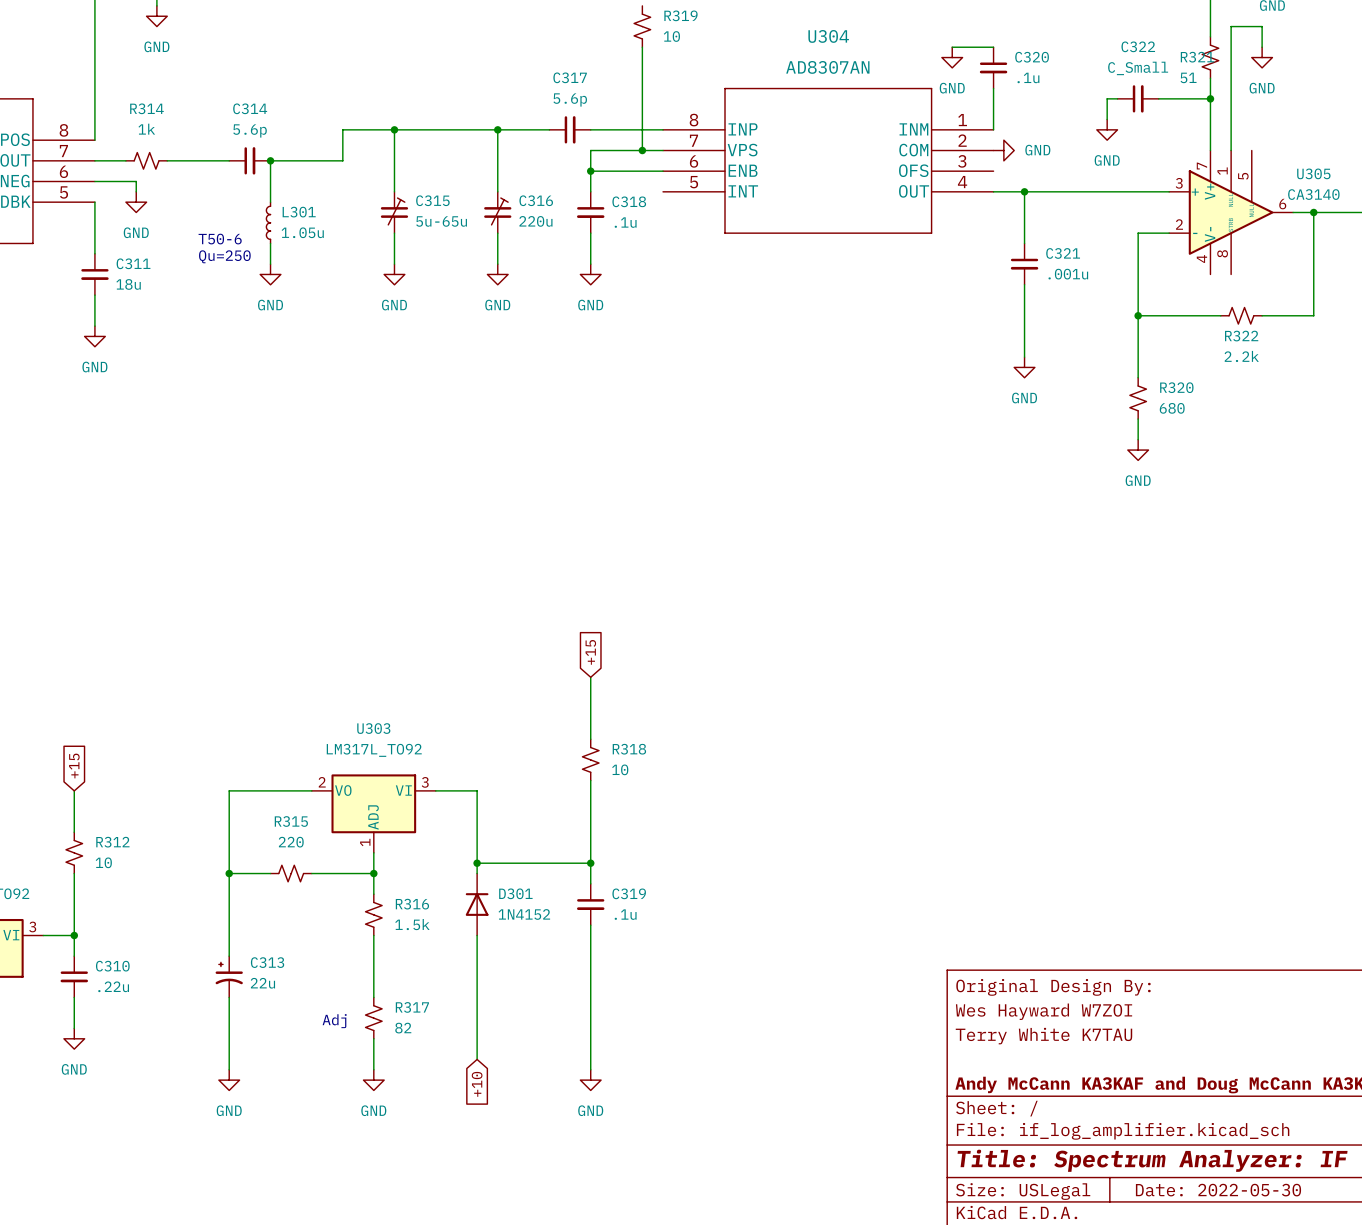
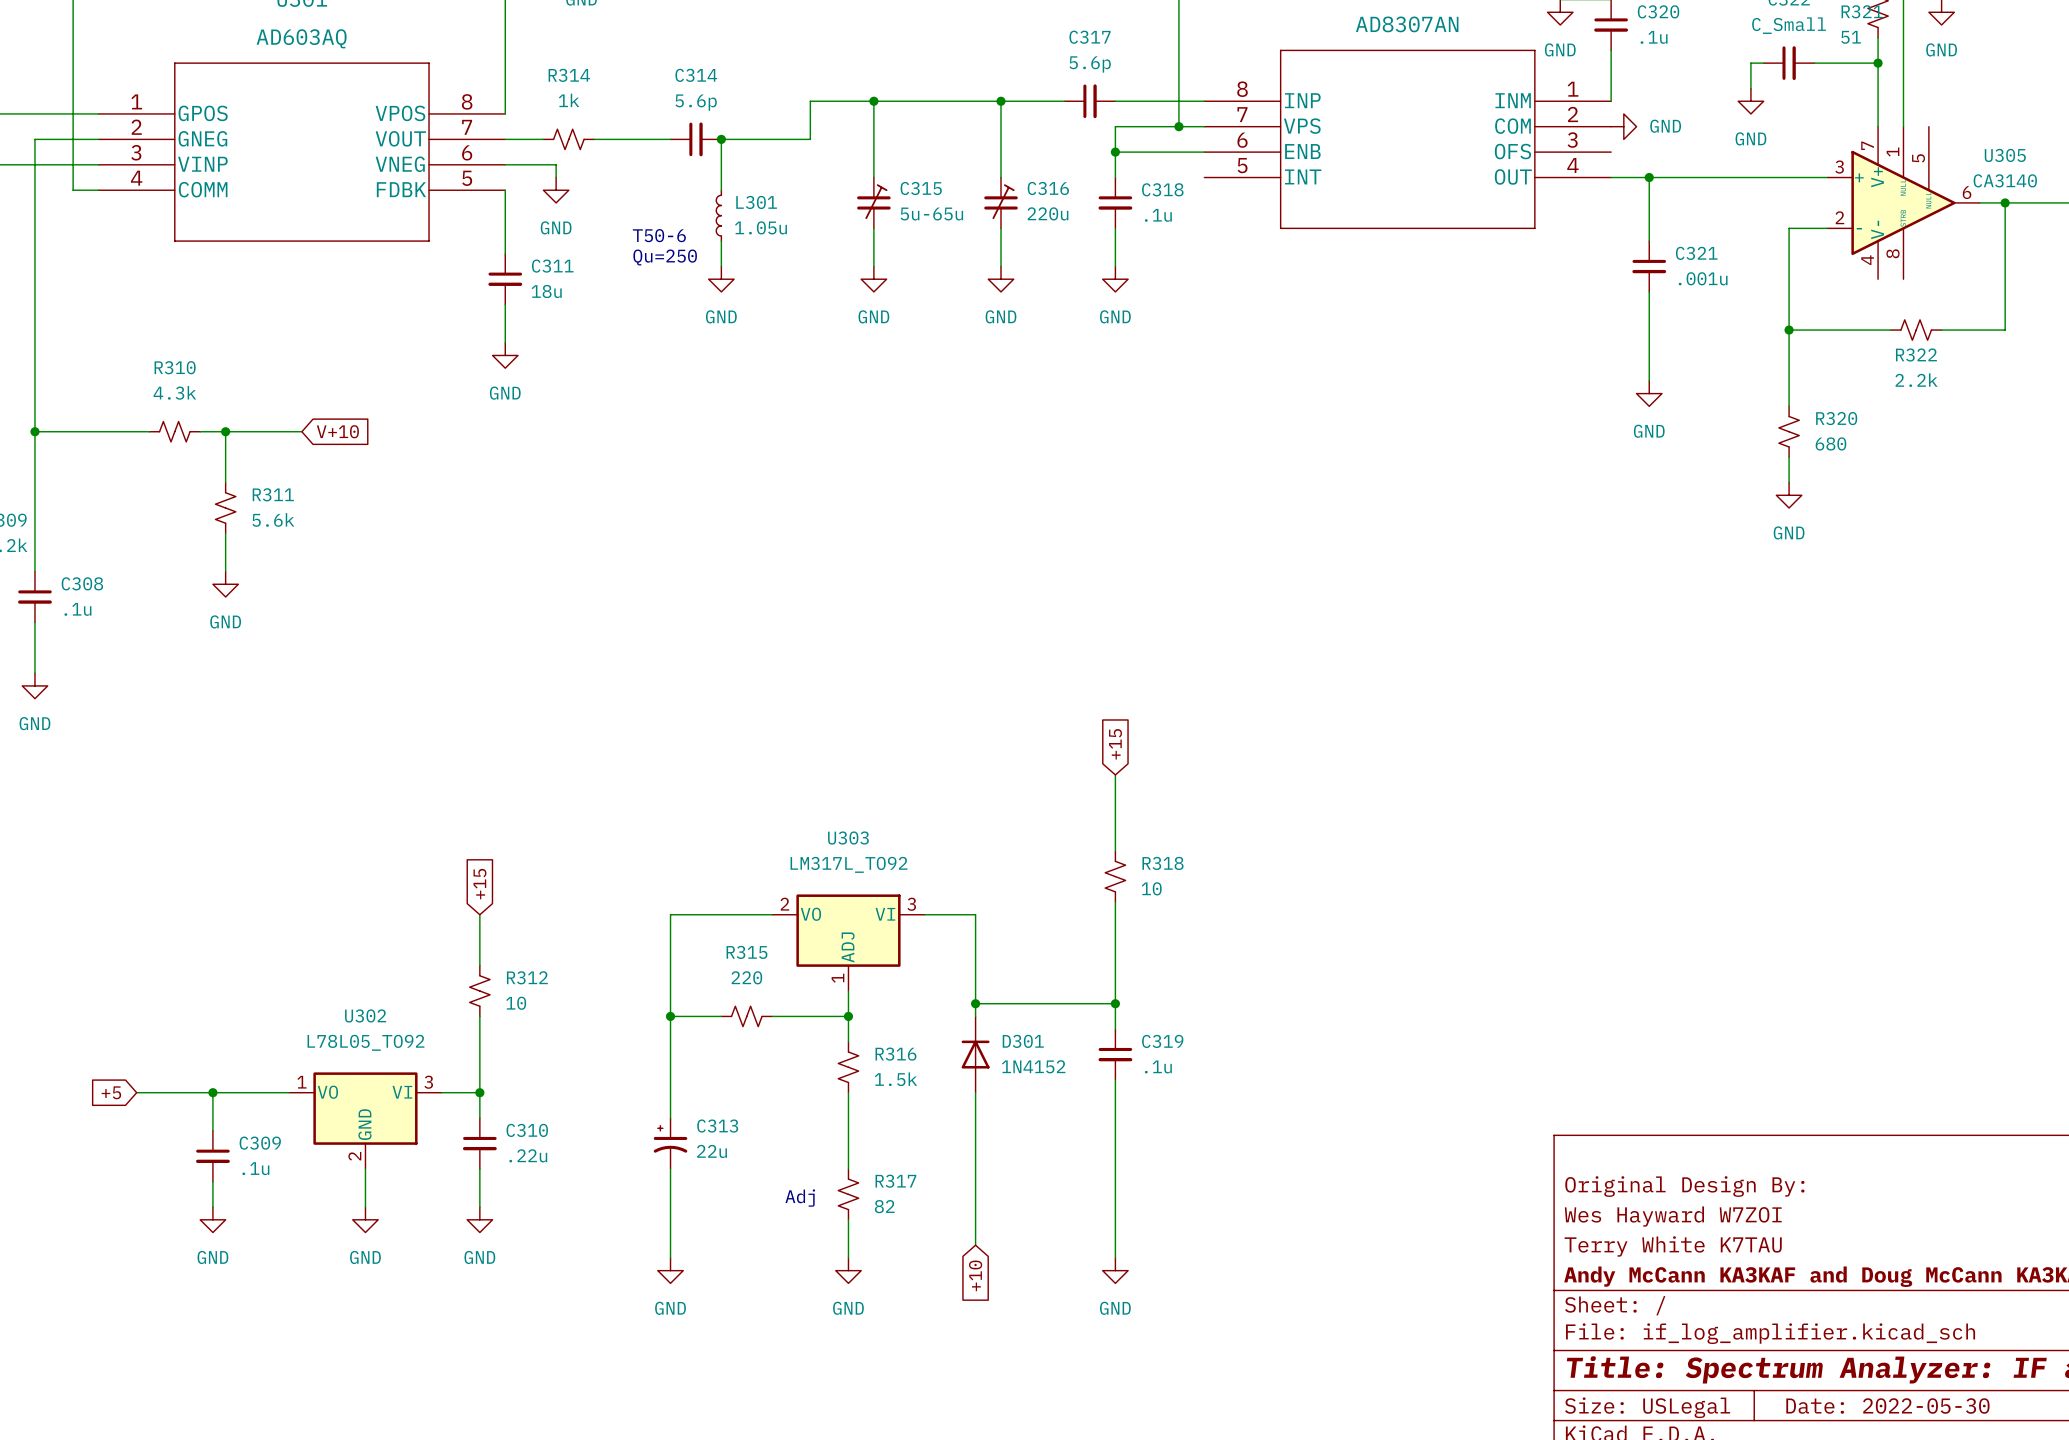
title block: Original Design By: (1053, 987) -> none
title block: Wes Hayward W7ZOI (1044, 1011) -> Original Design By: (1684, 1186)
title block: Terry White K7TAU (1043, 1036) -> Wes Hayward W7ZOI (1673, 1216)
title block: none -> Terry White K7TAU (1673, 1246)

